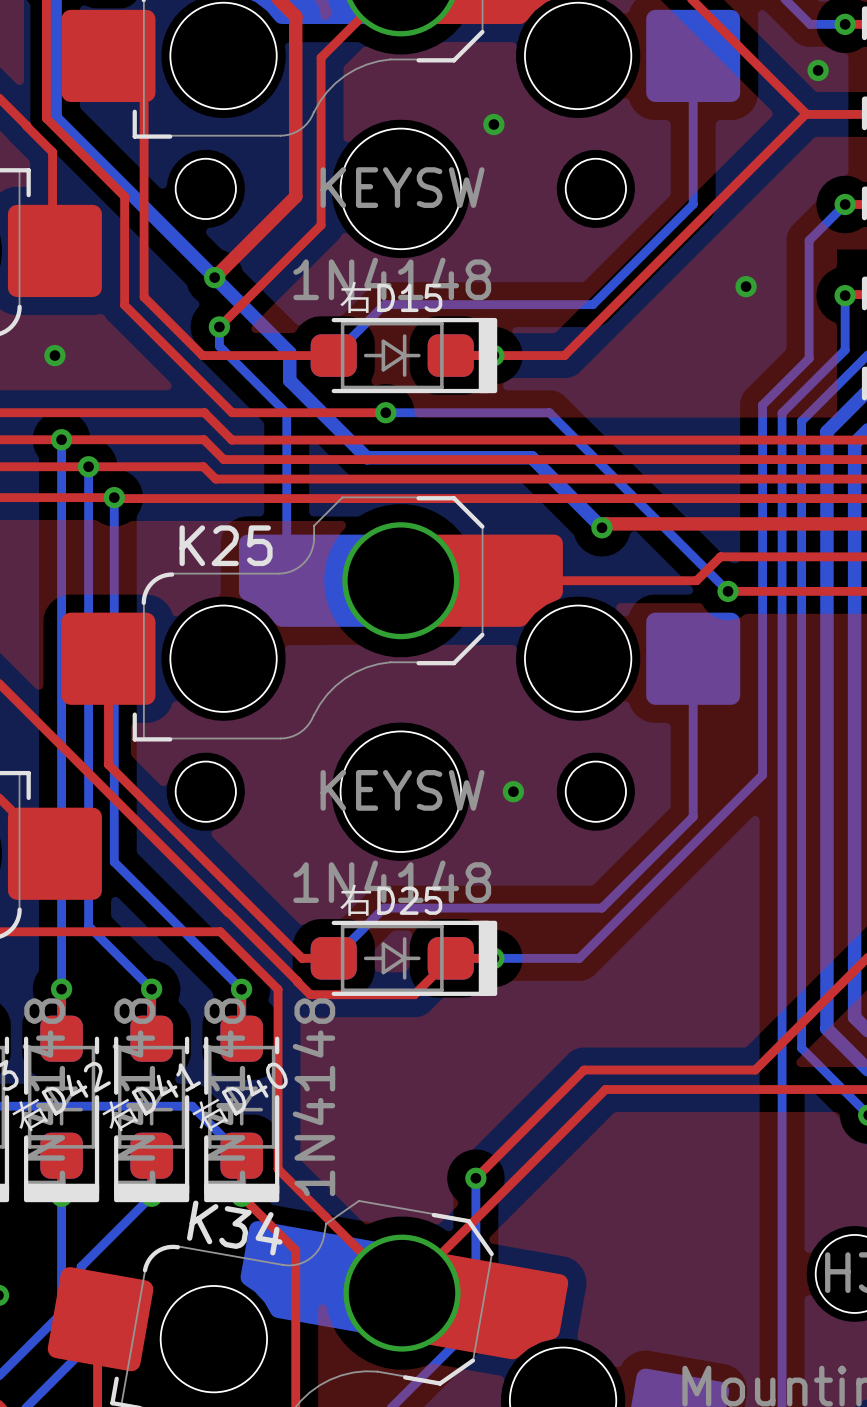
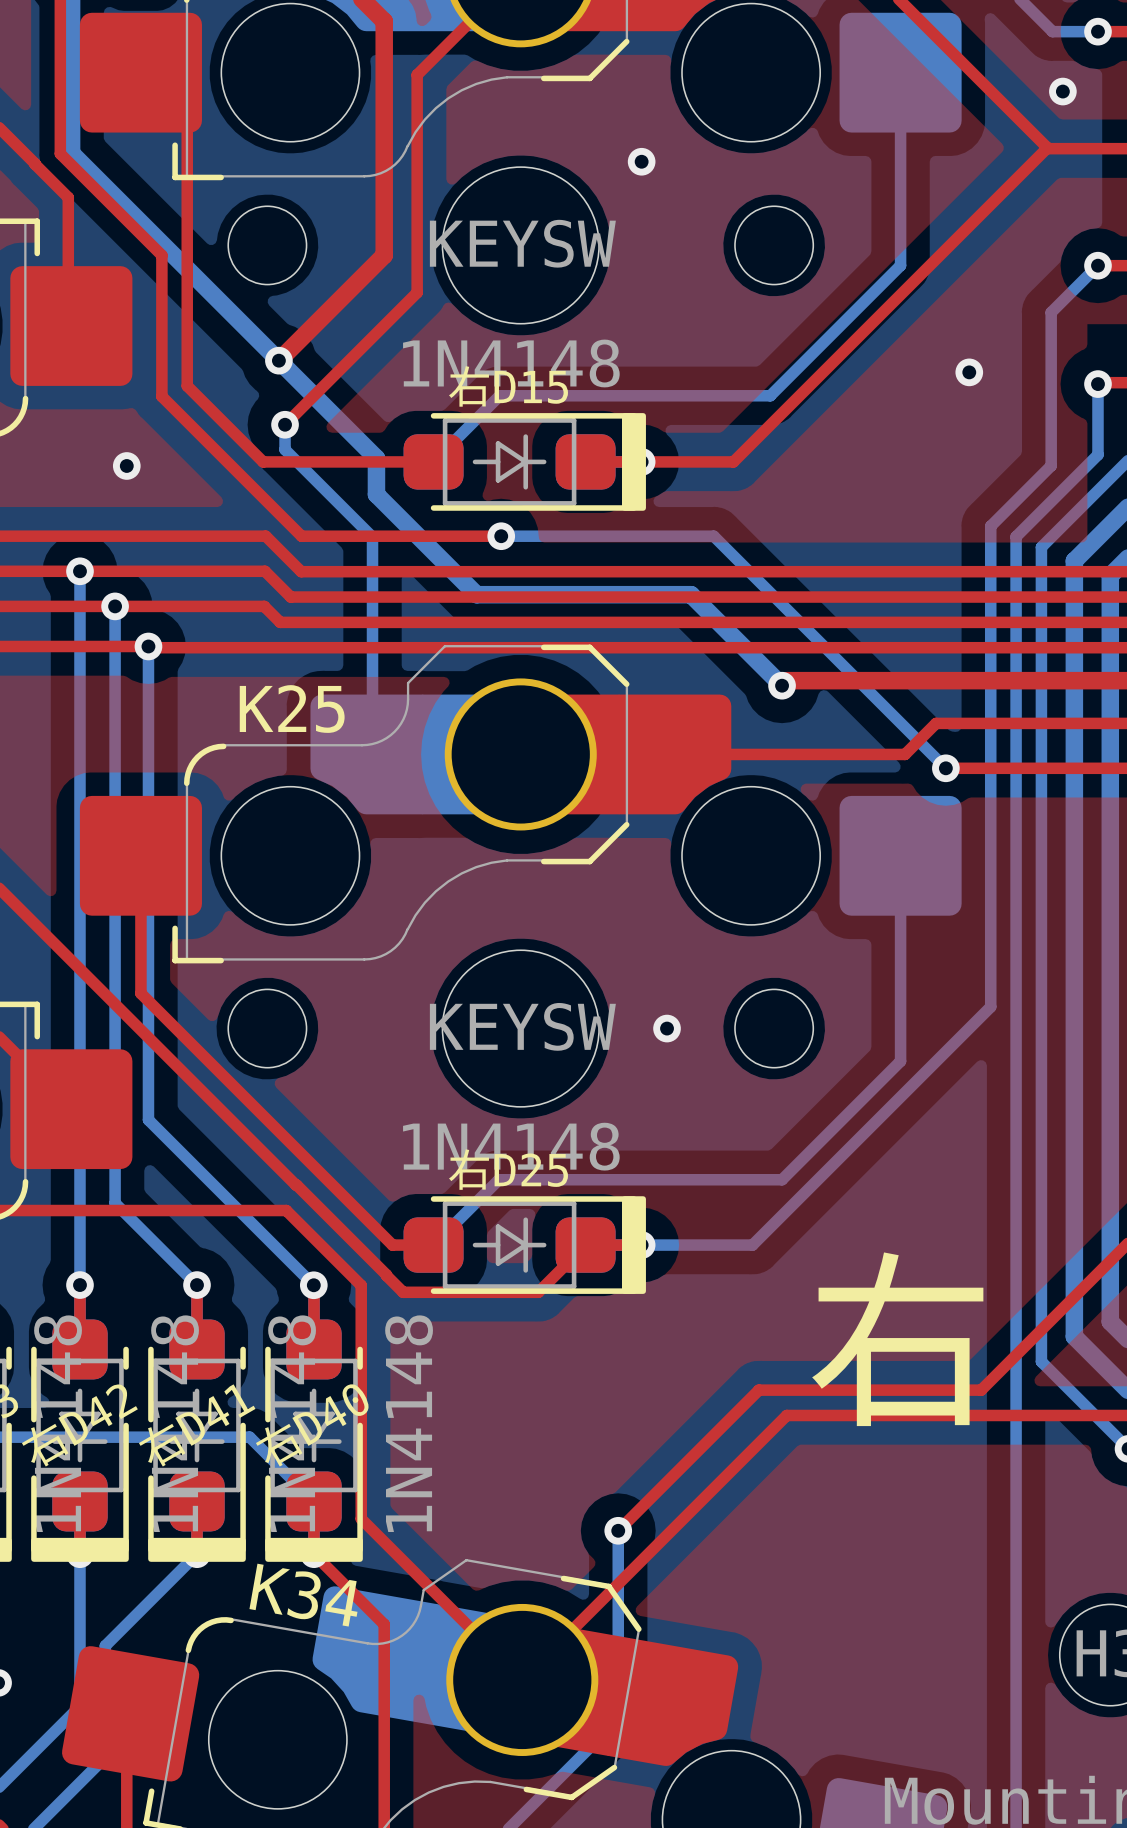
via position: (54, 355) -> (126, 465)
text: none -> 右 (897, 1339)

